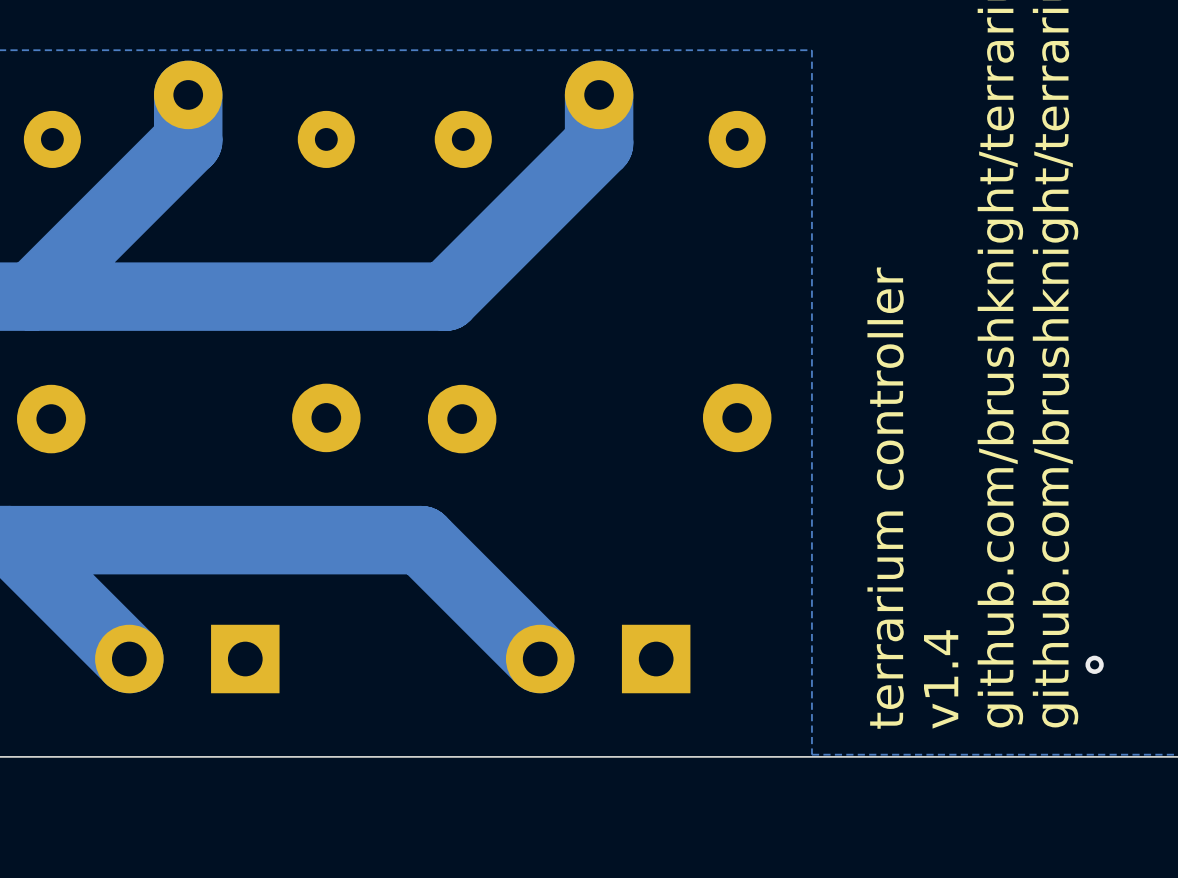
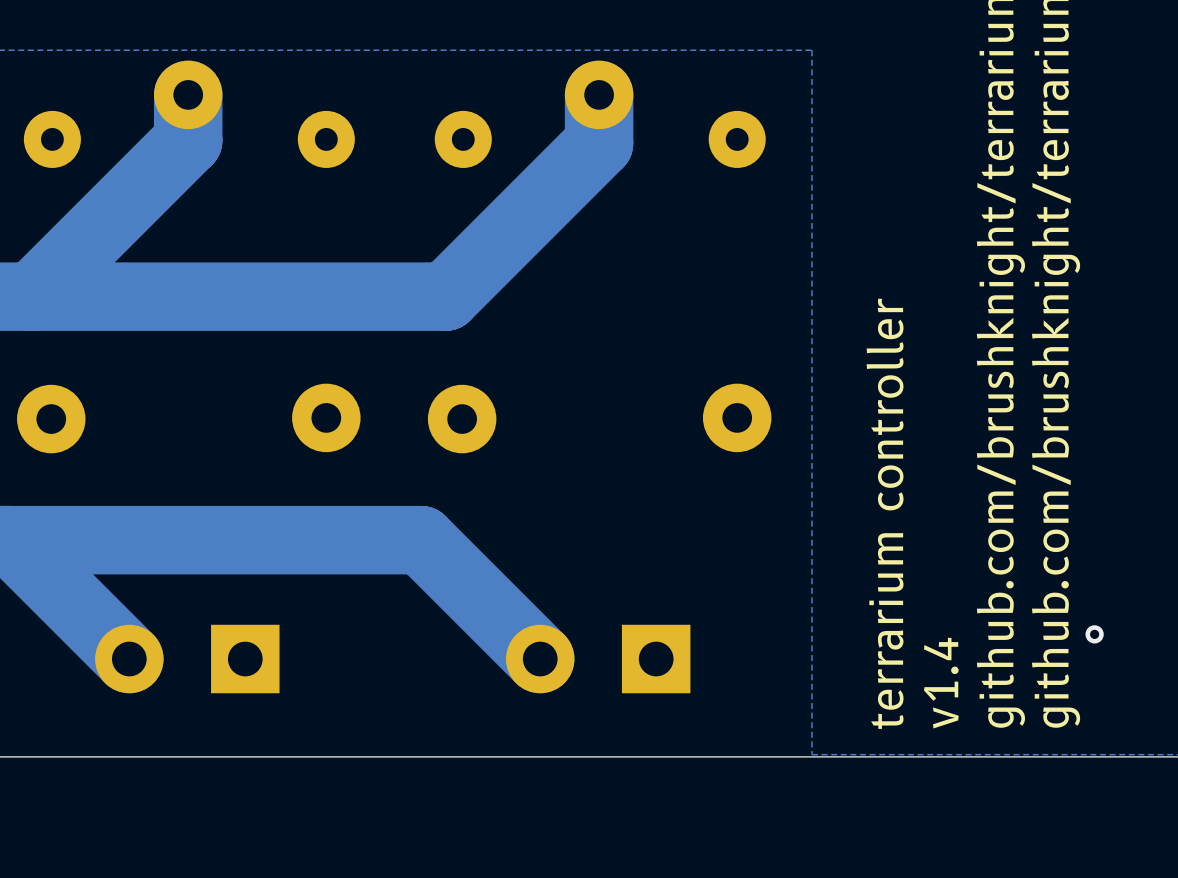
via position: (1094, 664) -> (1094, 634)

